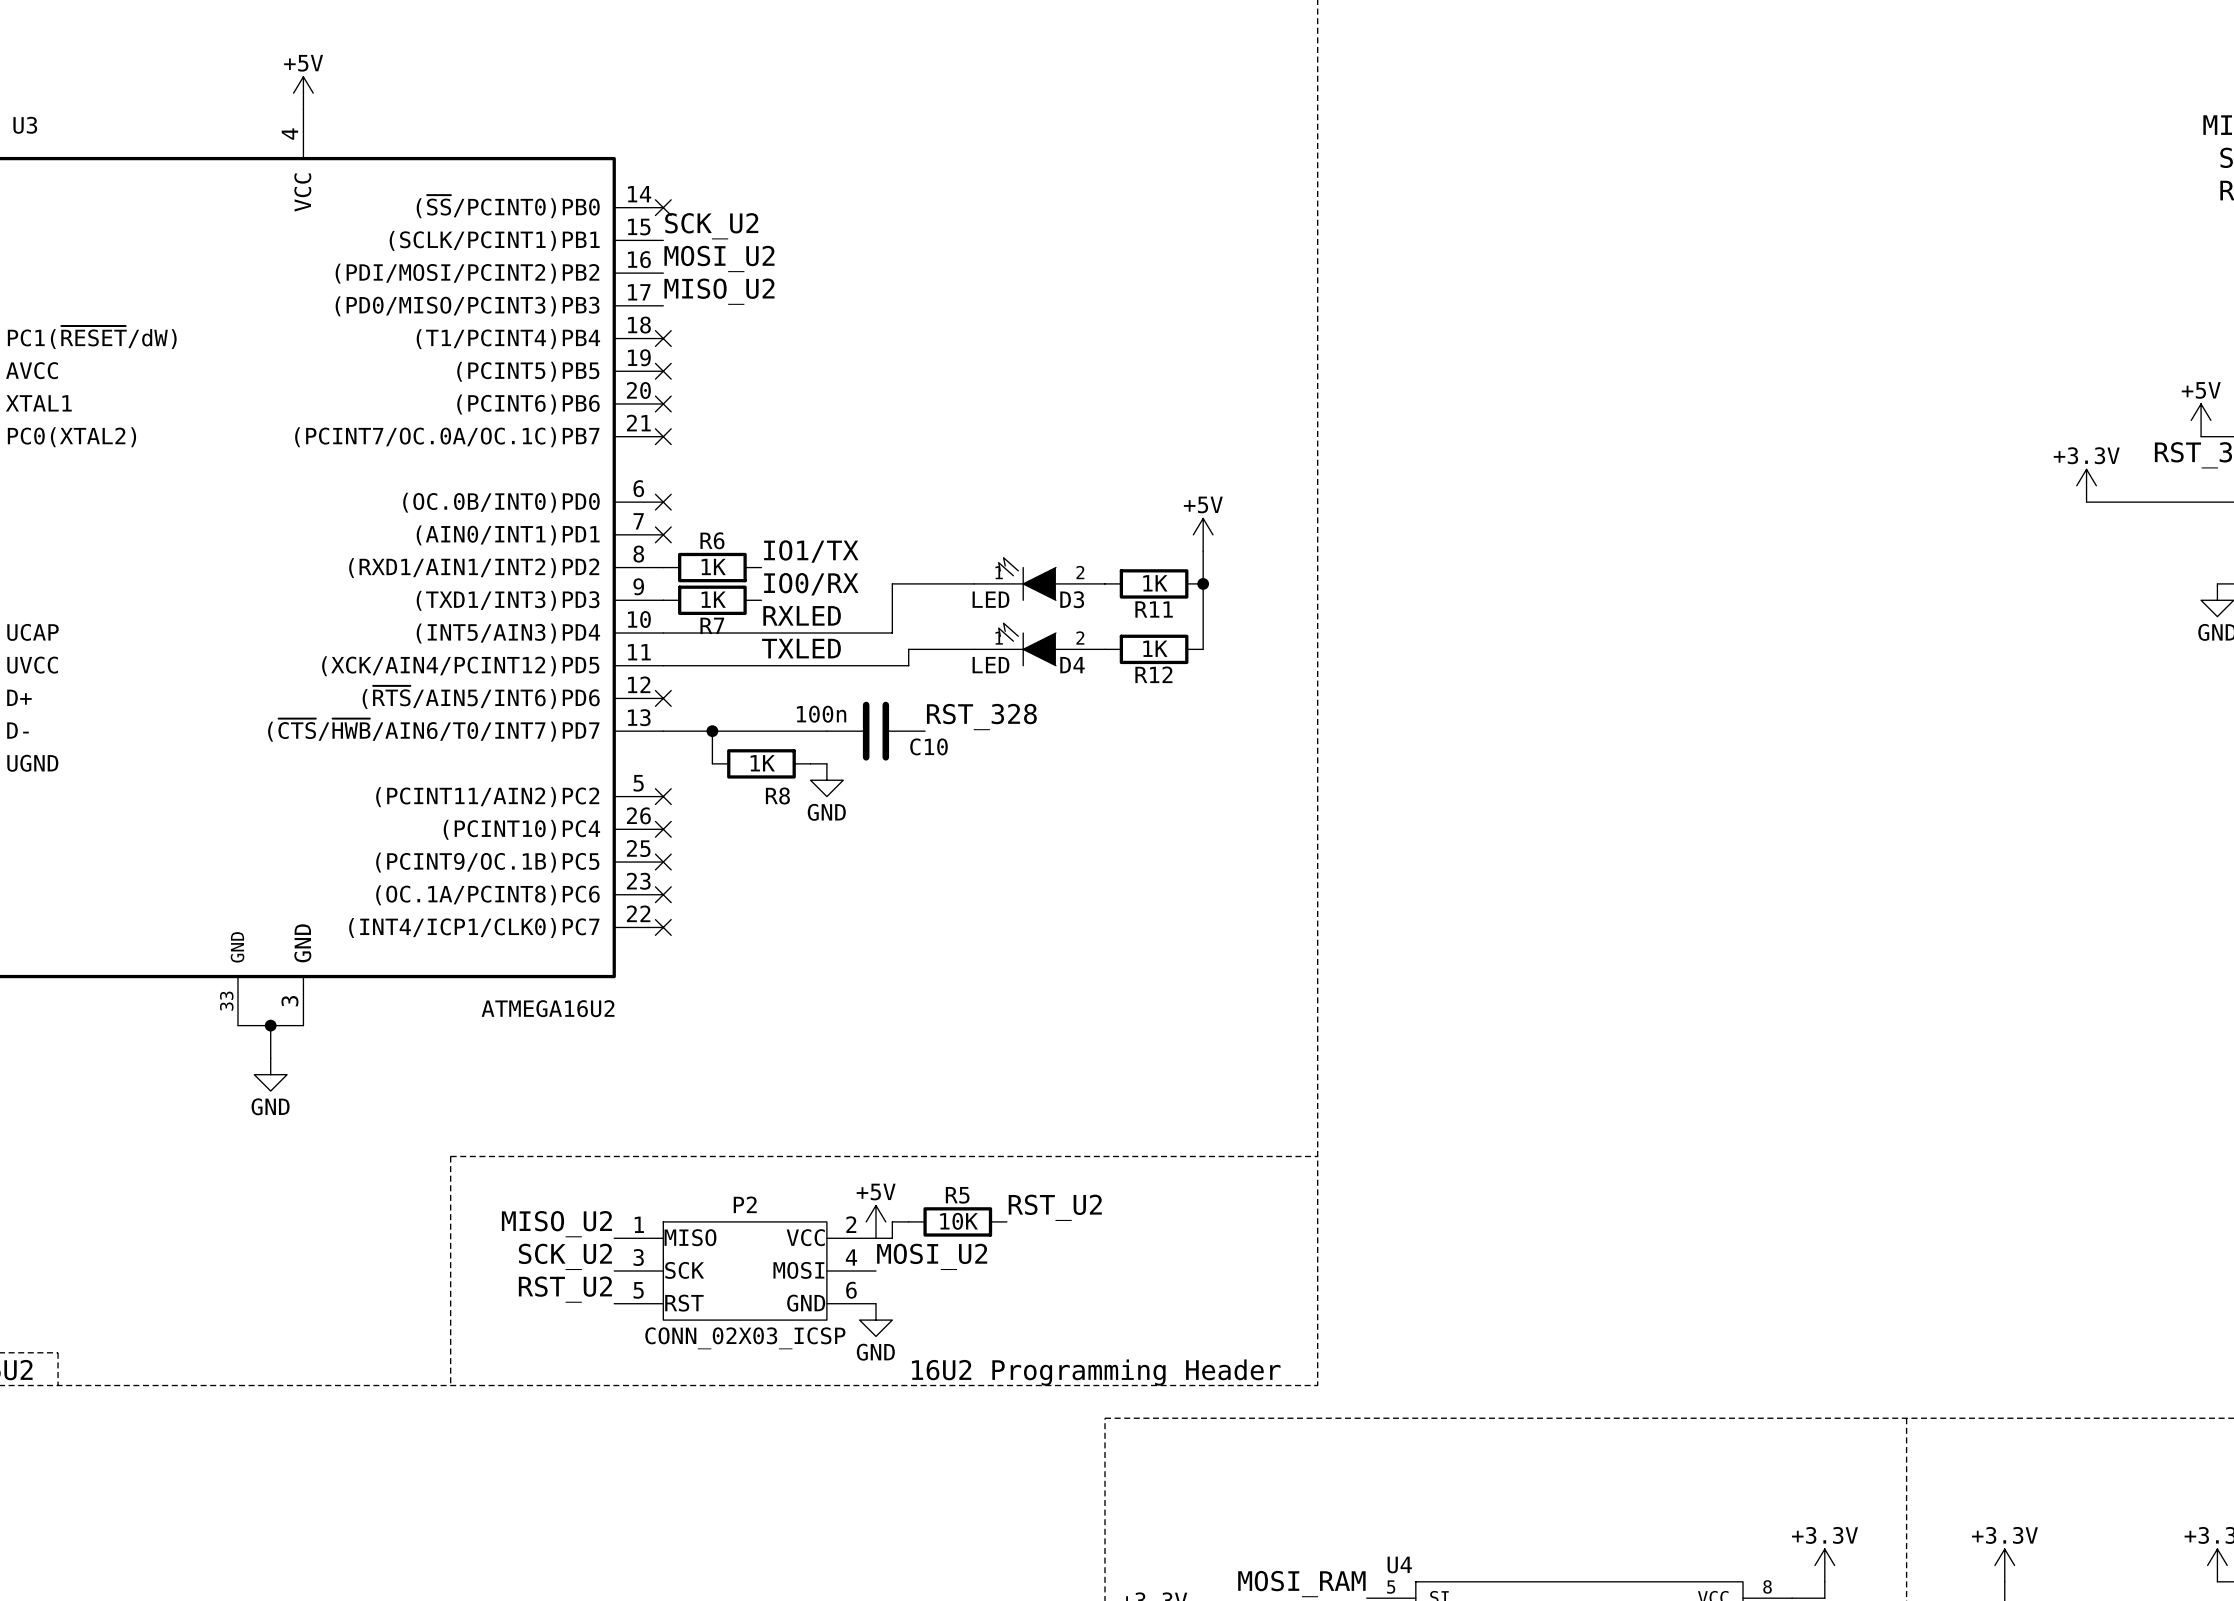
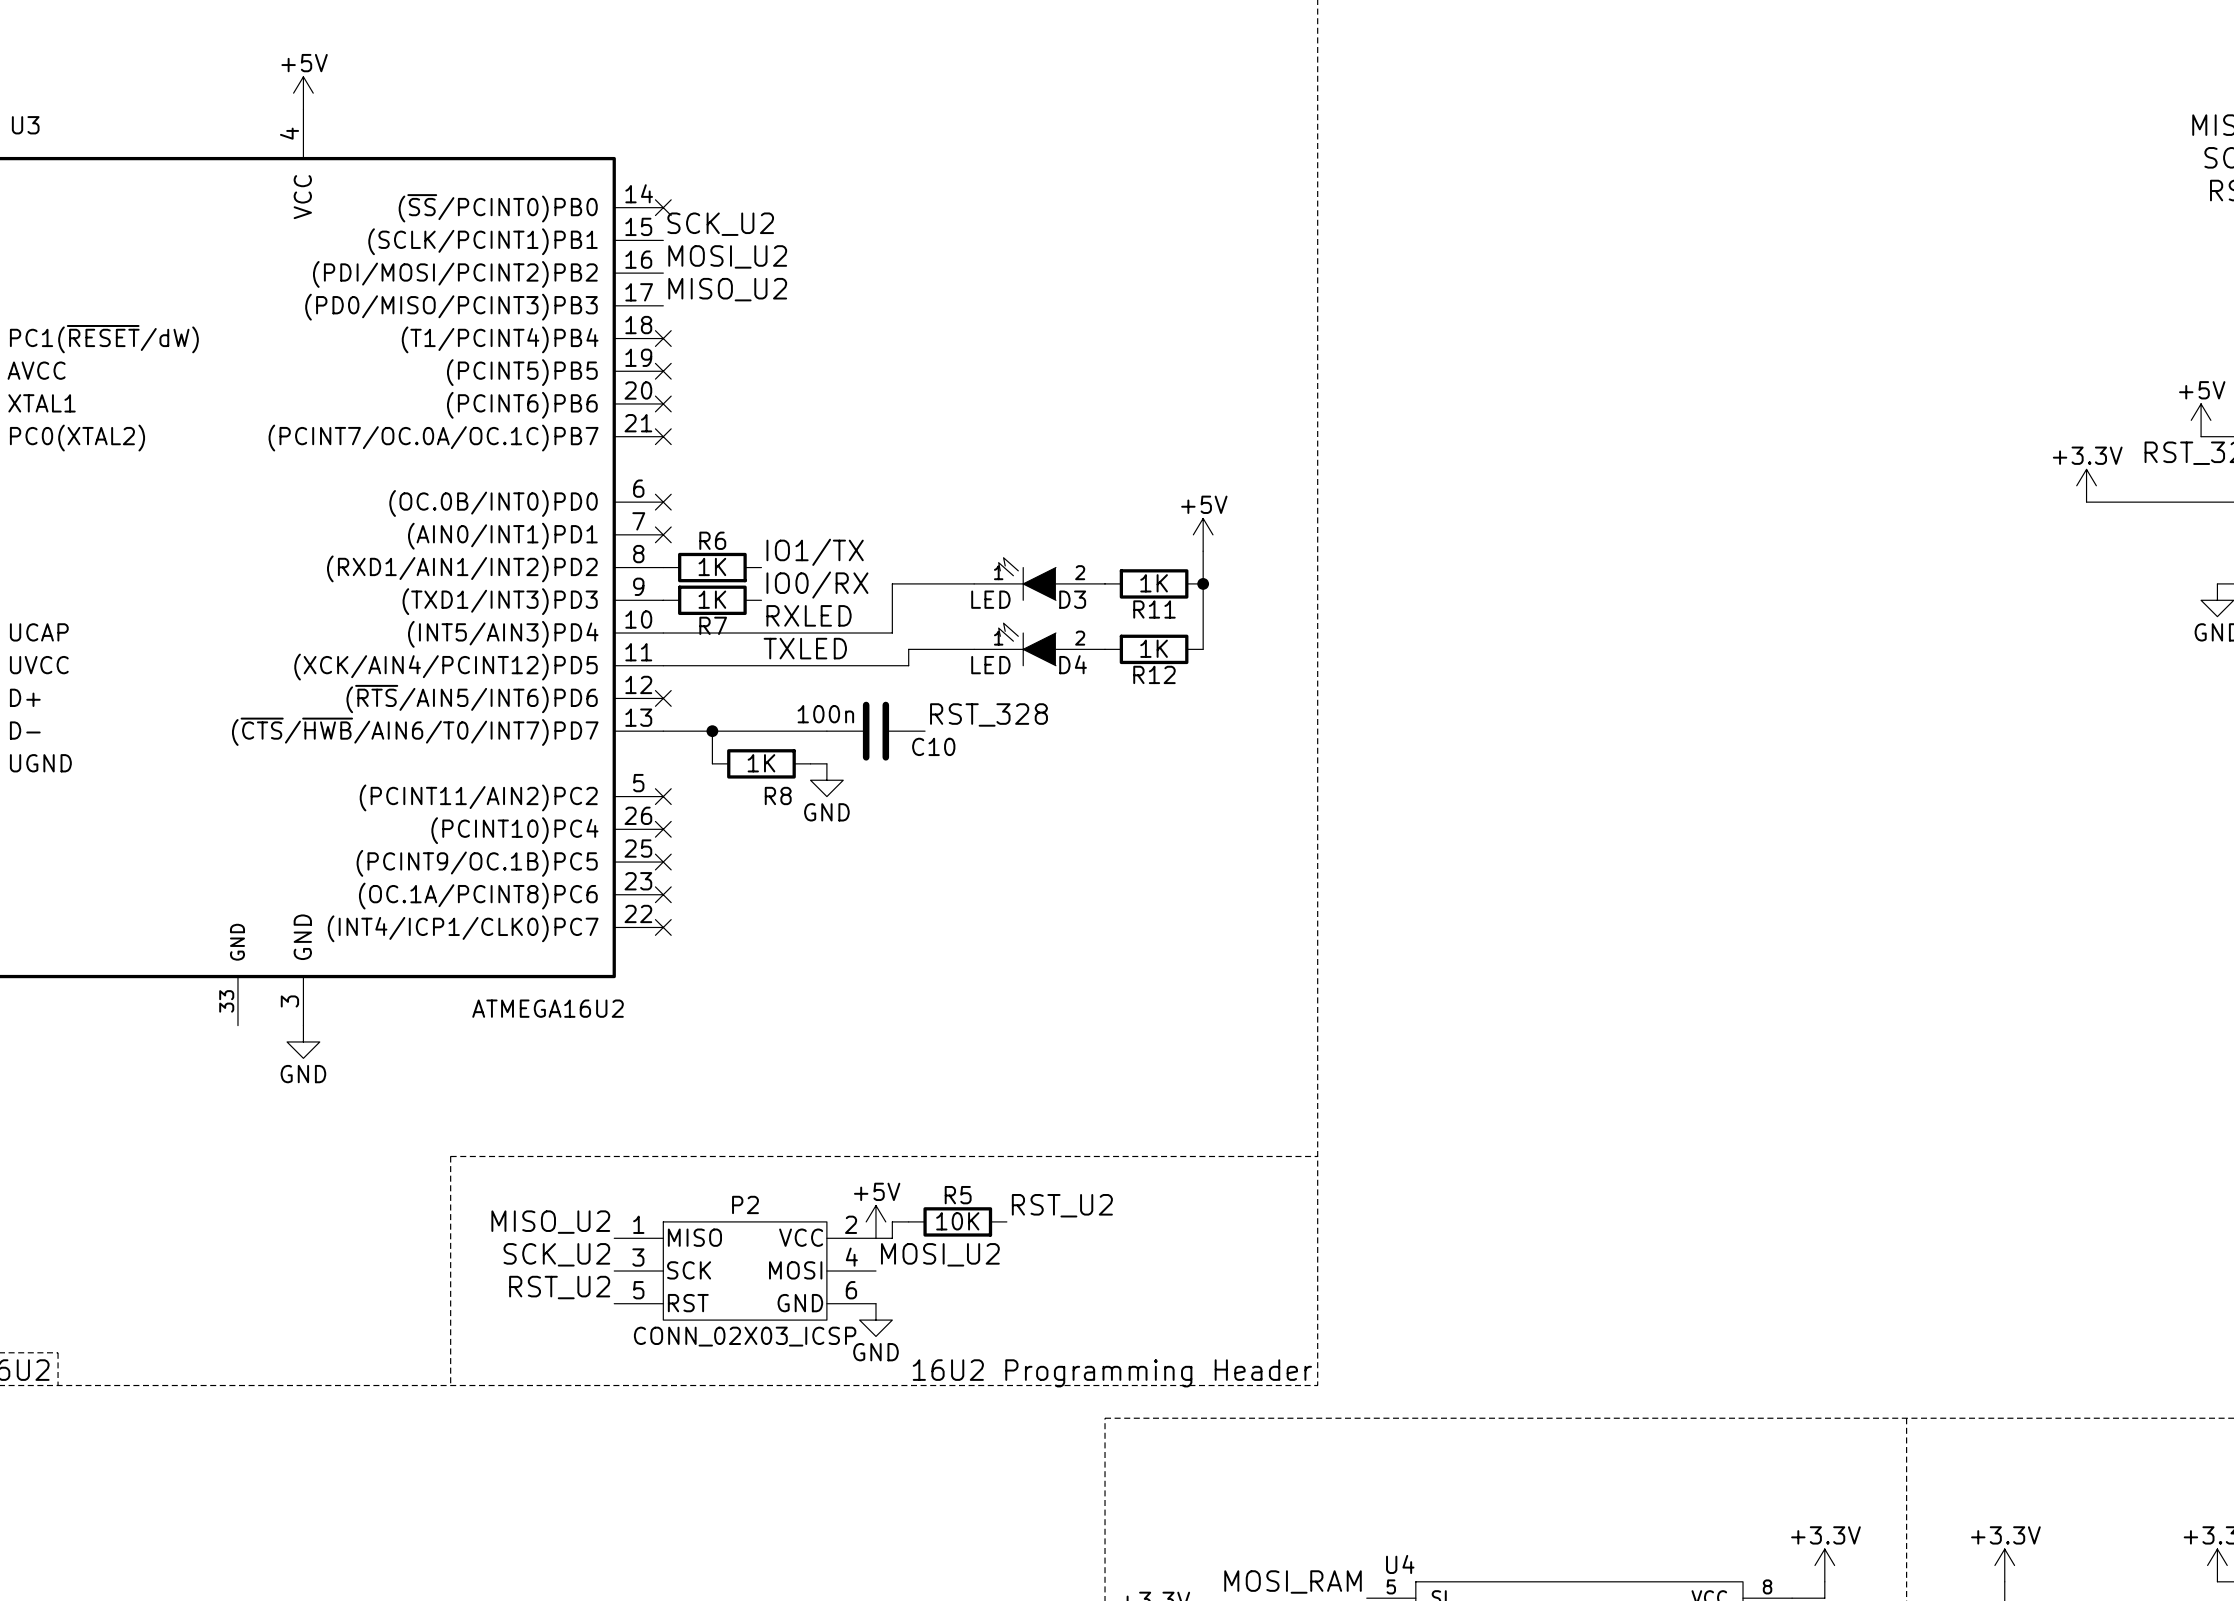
wire: (237, 1025) (303, 1025) -> none
wire: (270, 1025) (270, 1058) -> none
junction: (270, 1025) -> none
power symbol position: GND (270, 1074) -> GND (303, 1041)

